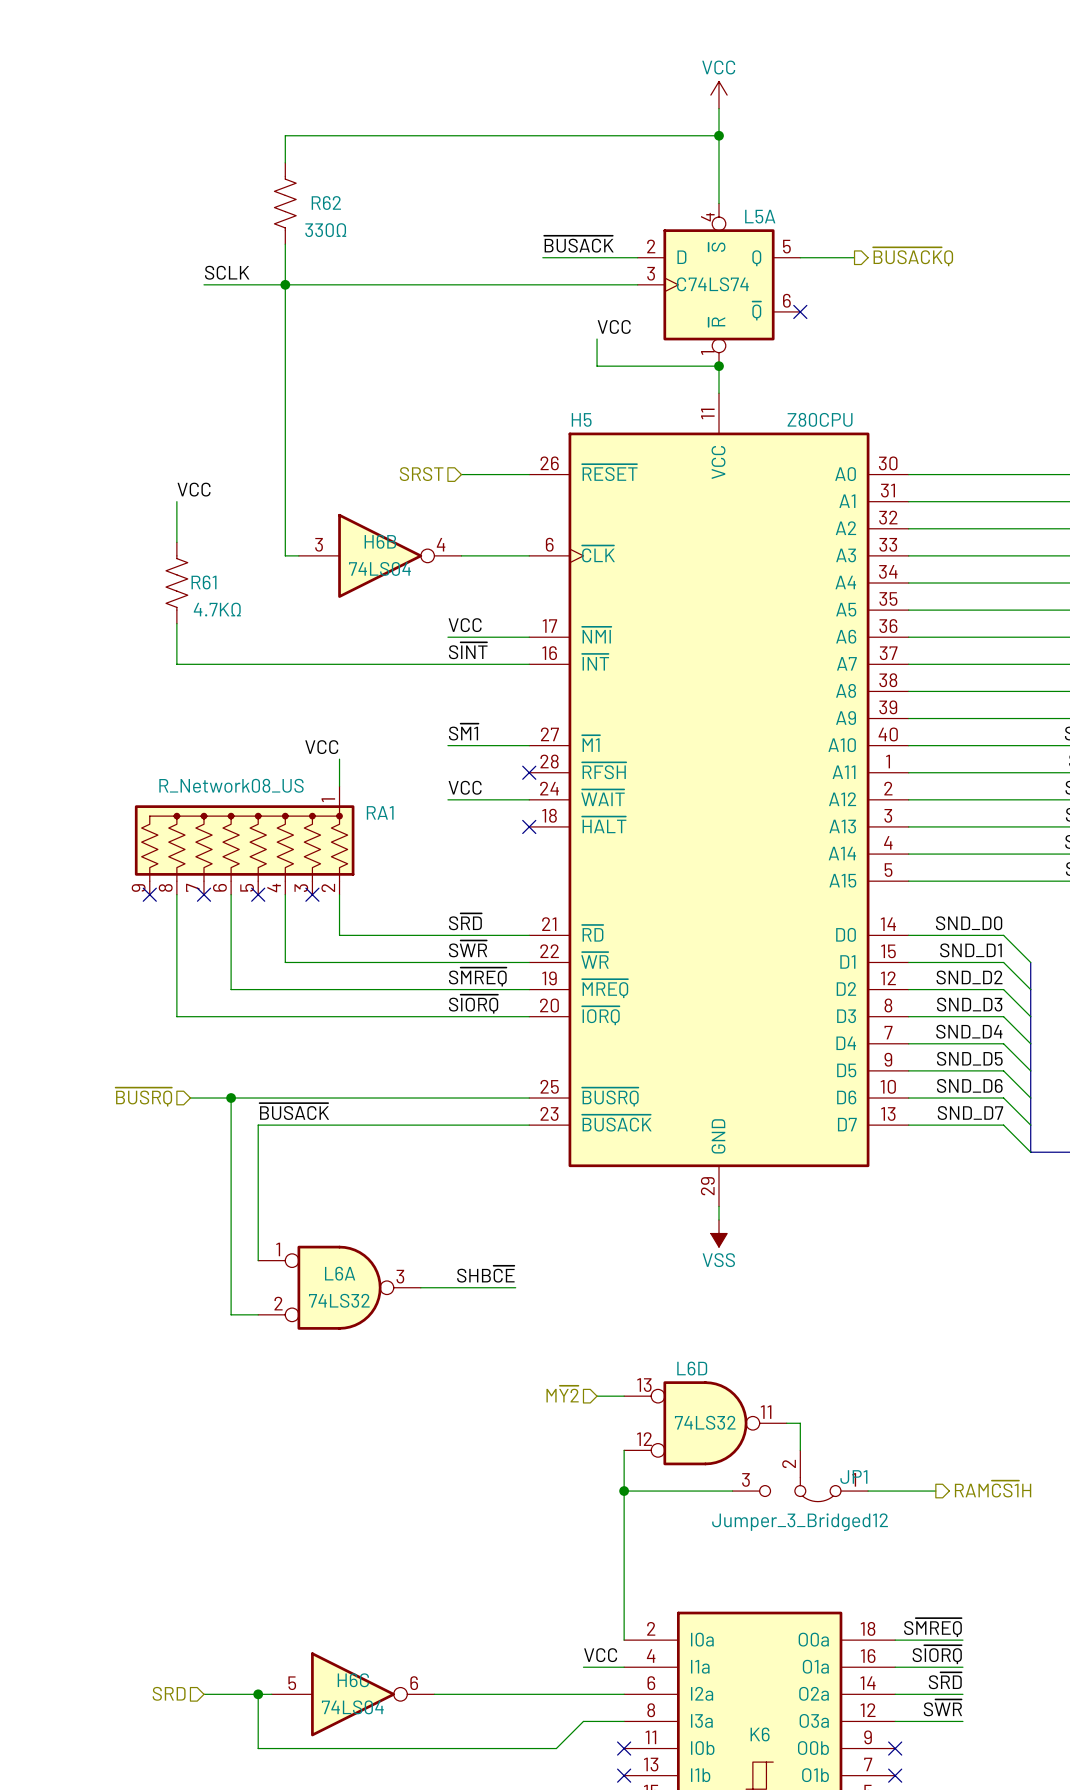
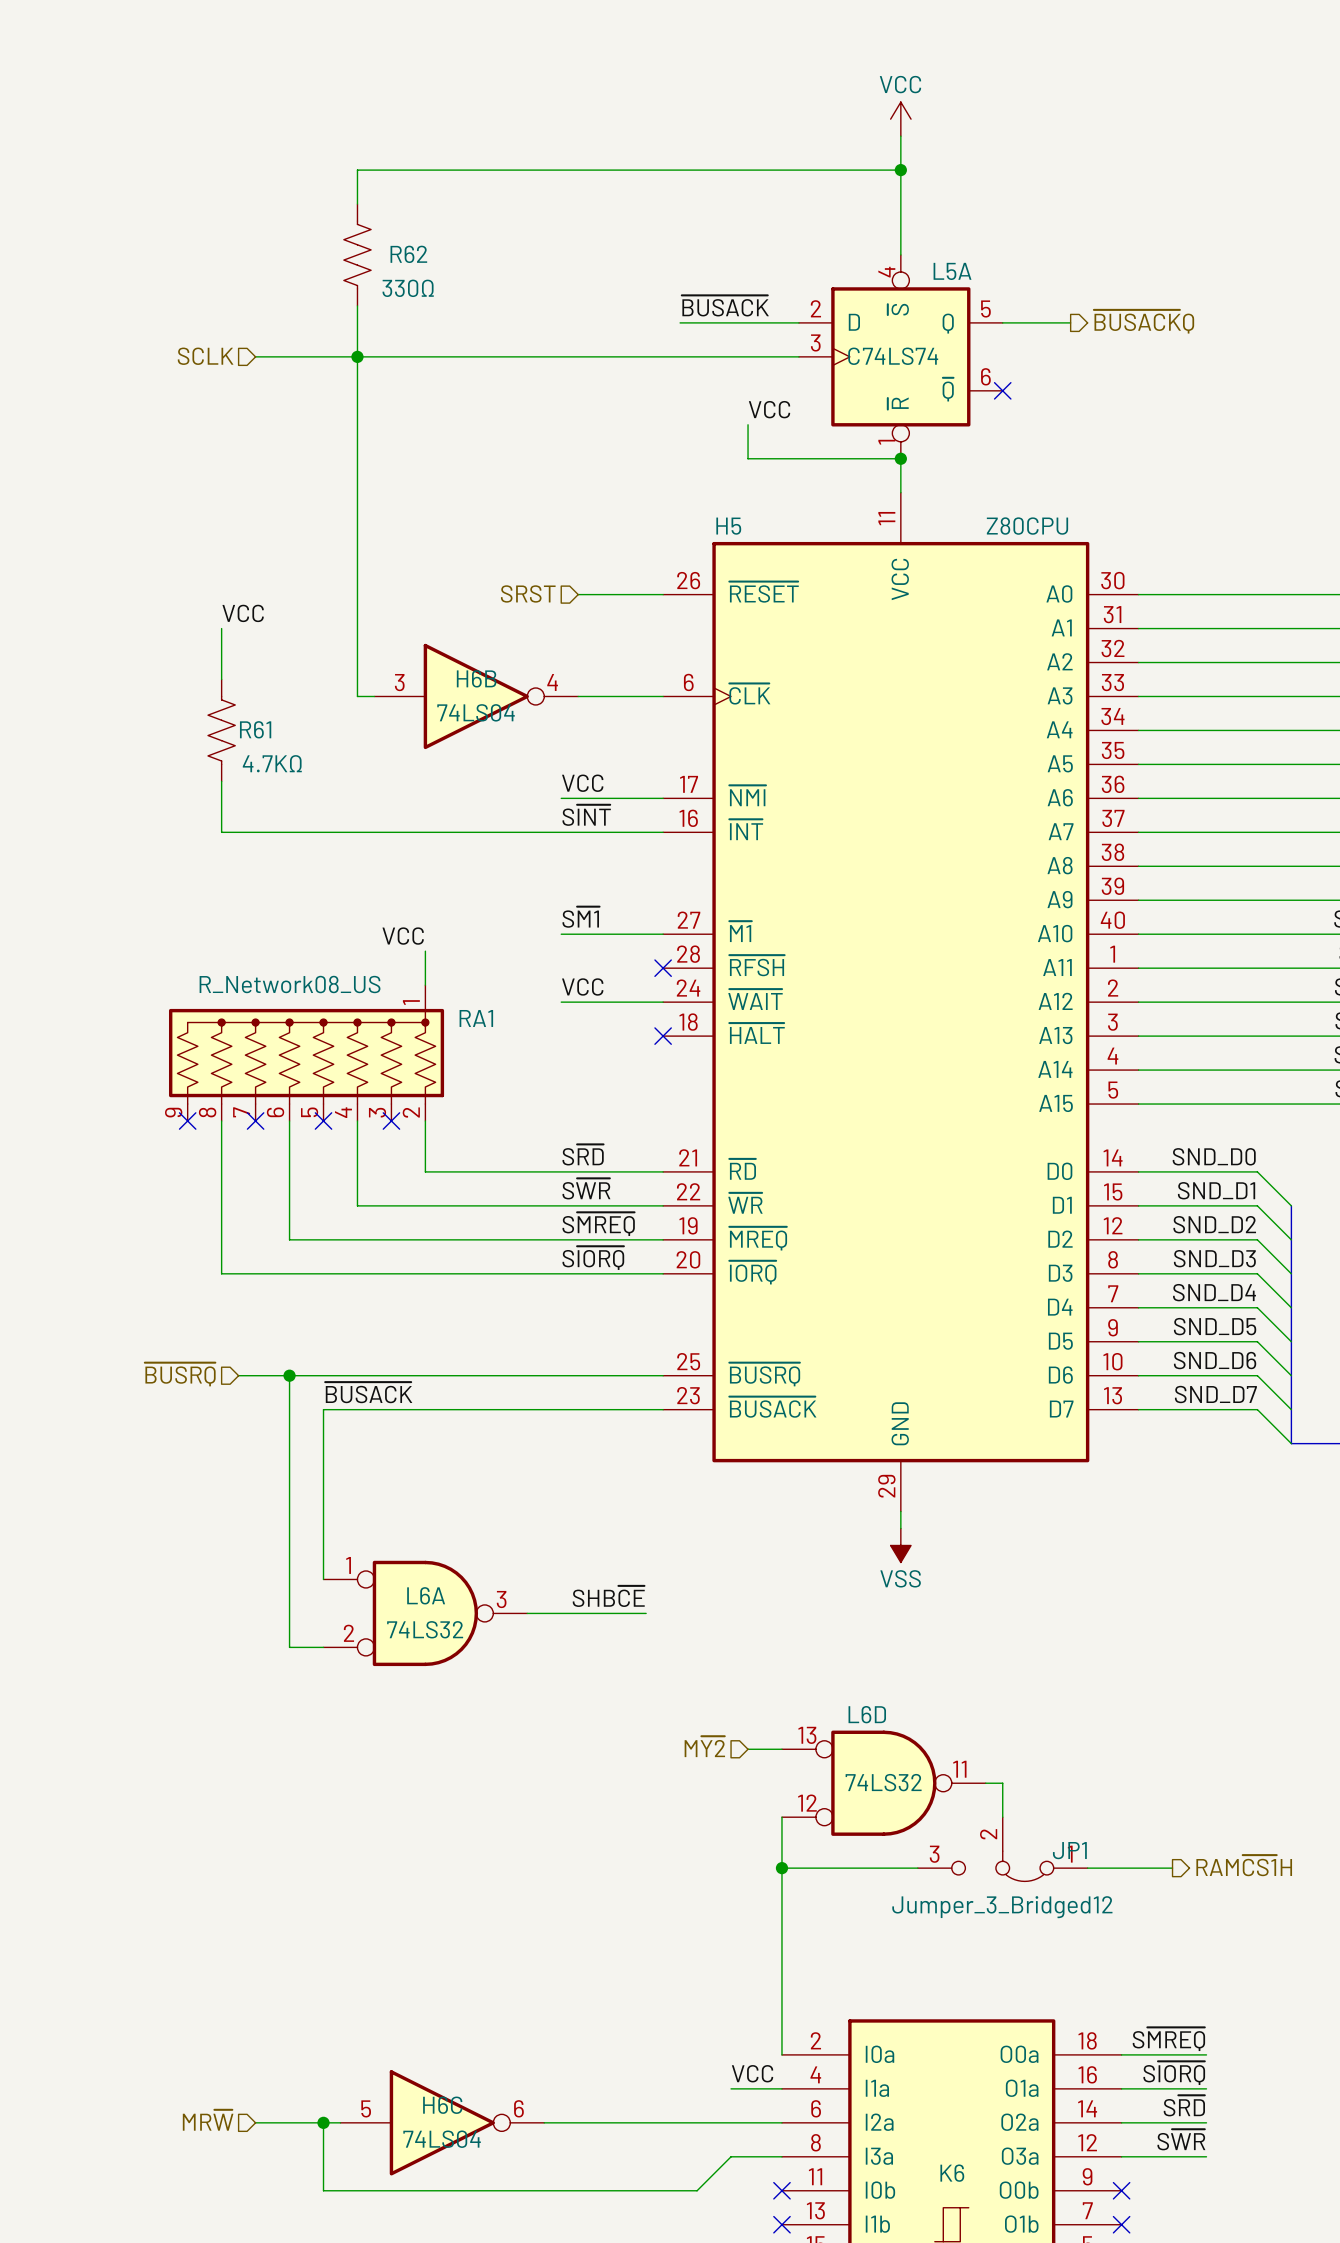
label: SCLK (227, 272) -> none
hierarchical label: none -> SCLK (205, 356)
hierarchical label: SRD (169, 1693) -> MR~{W} (208, 2120)

